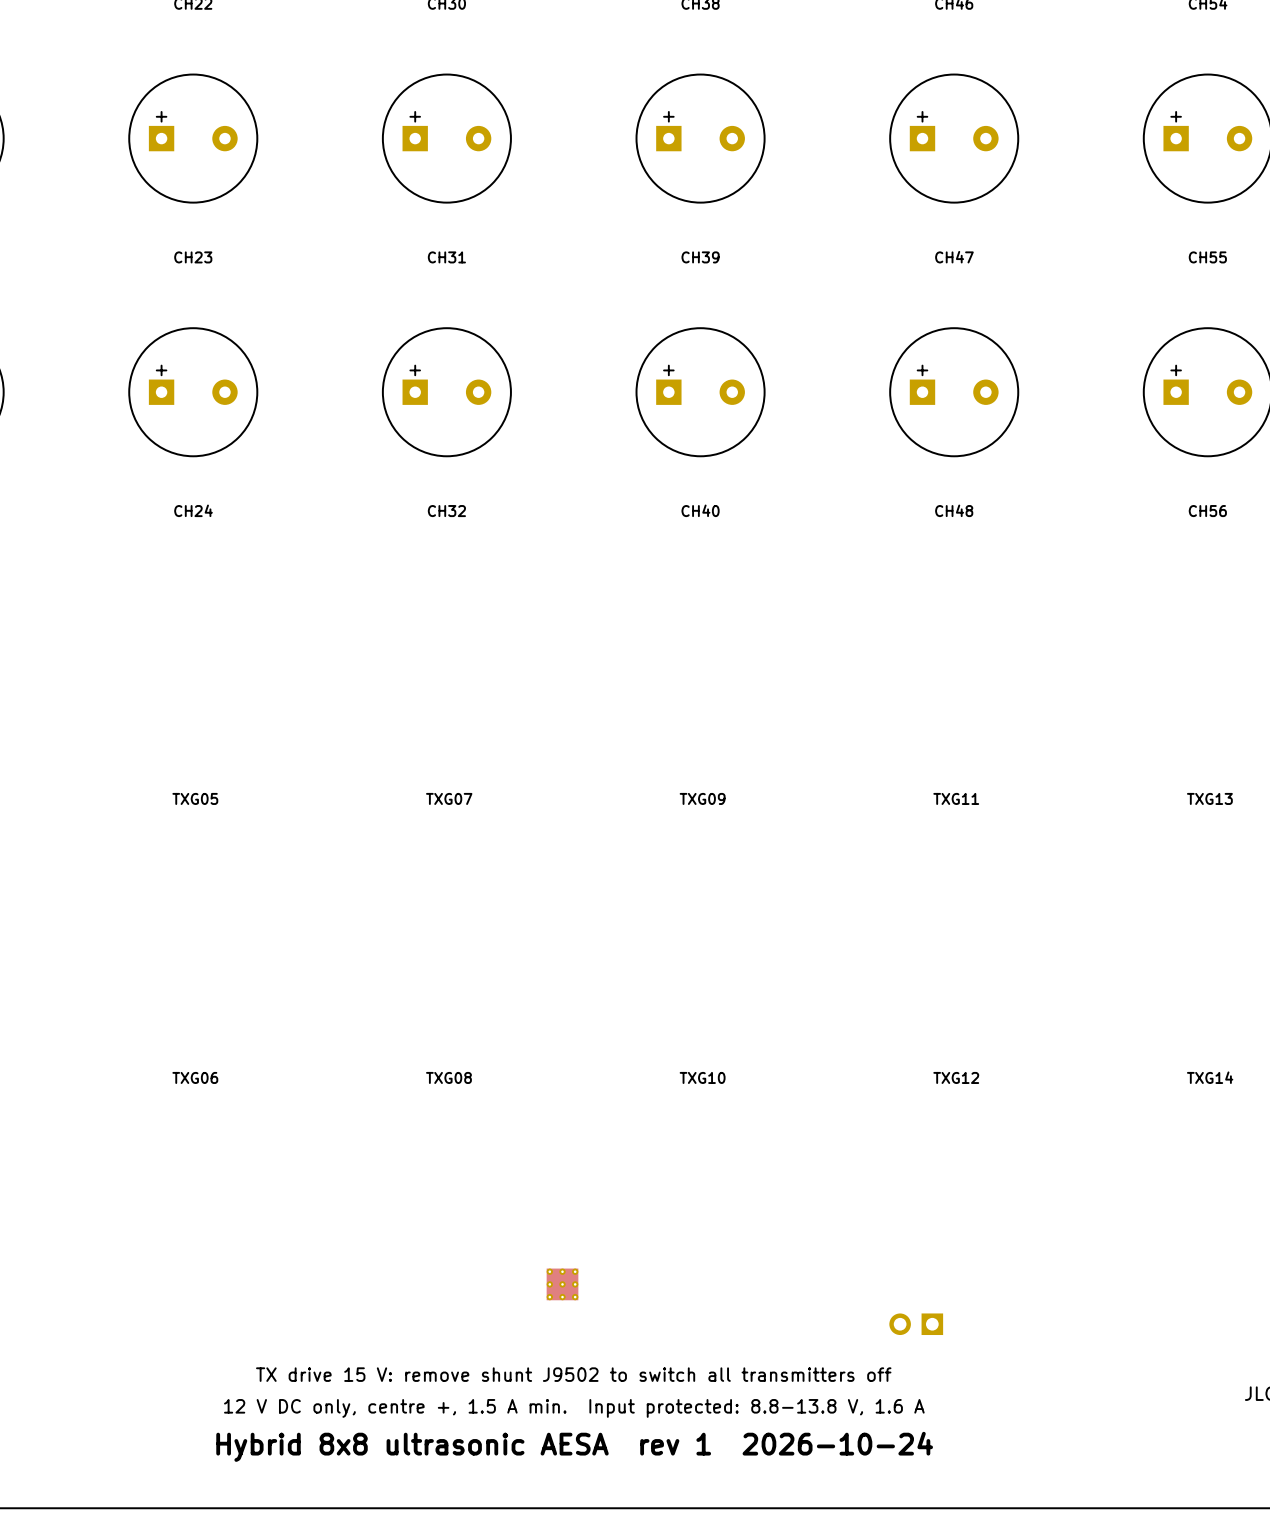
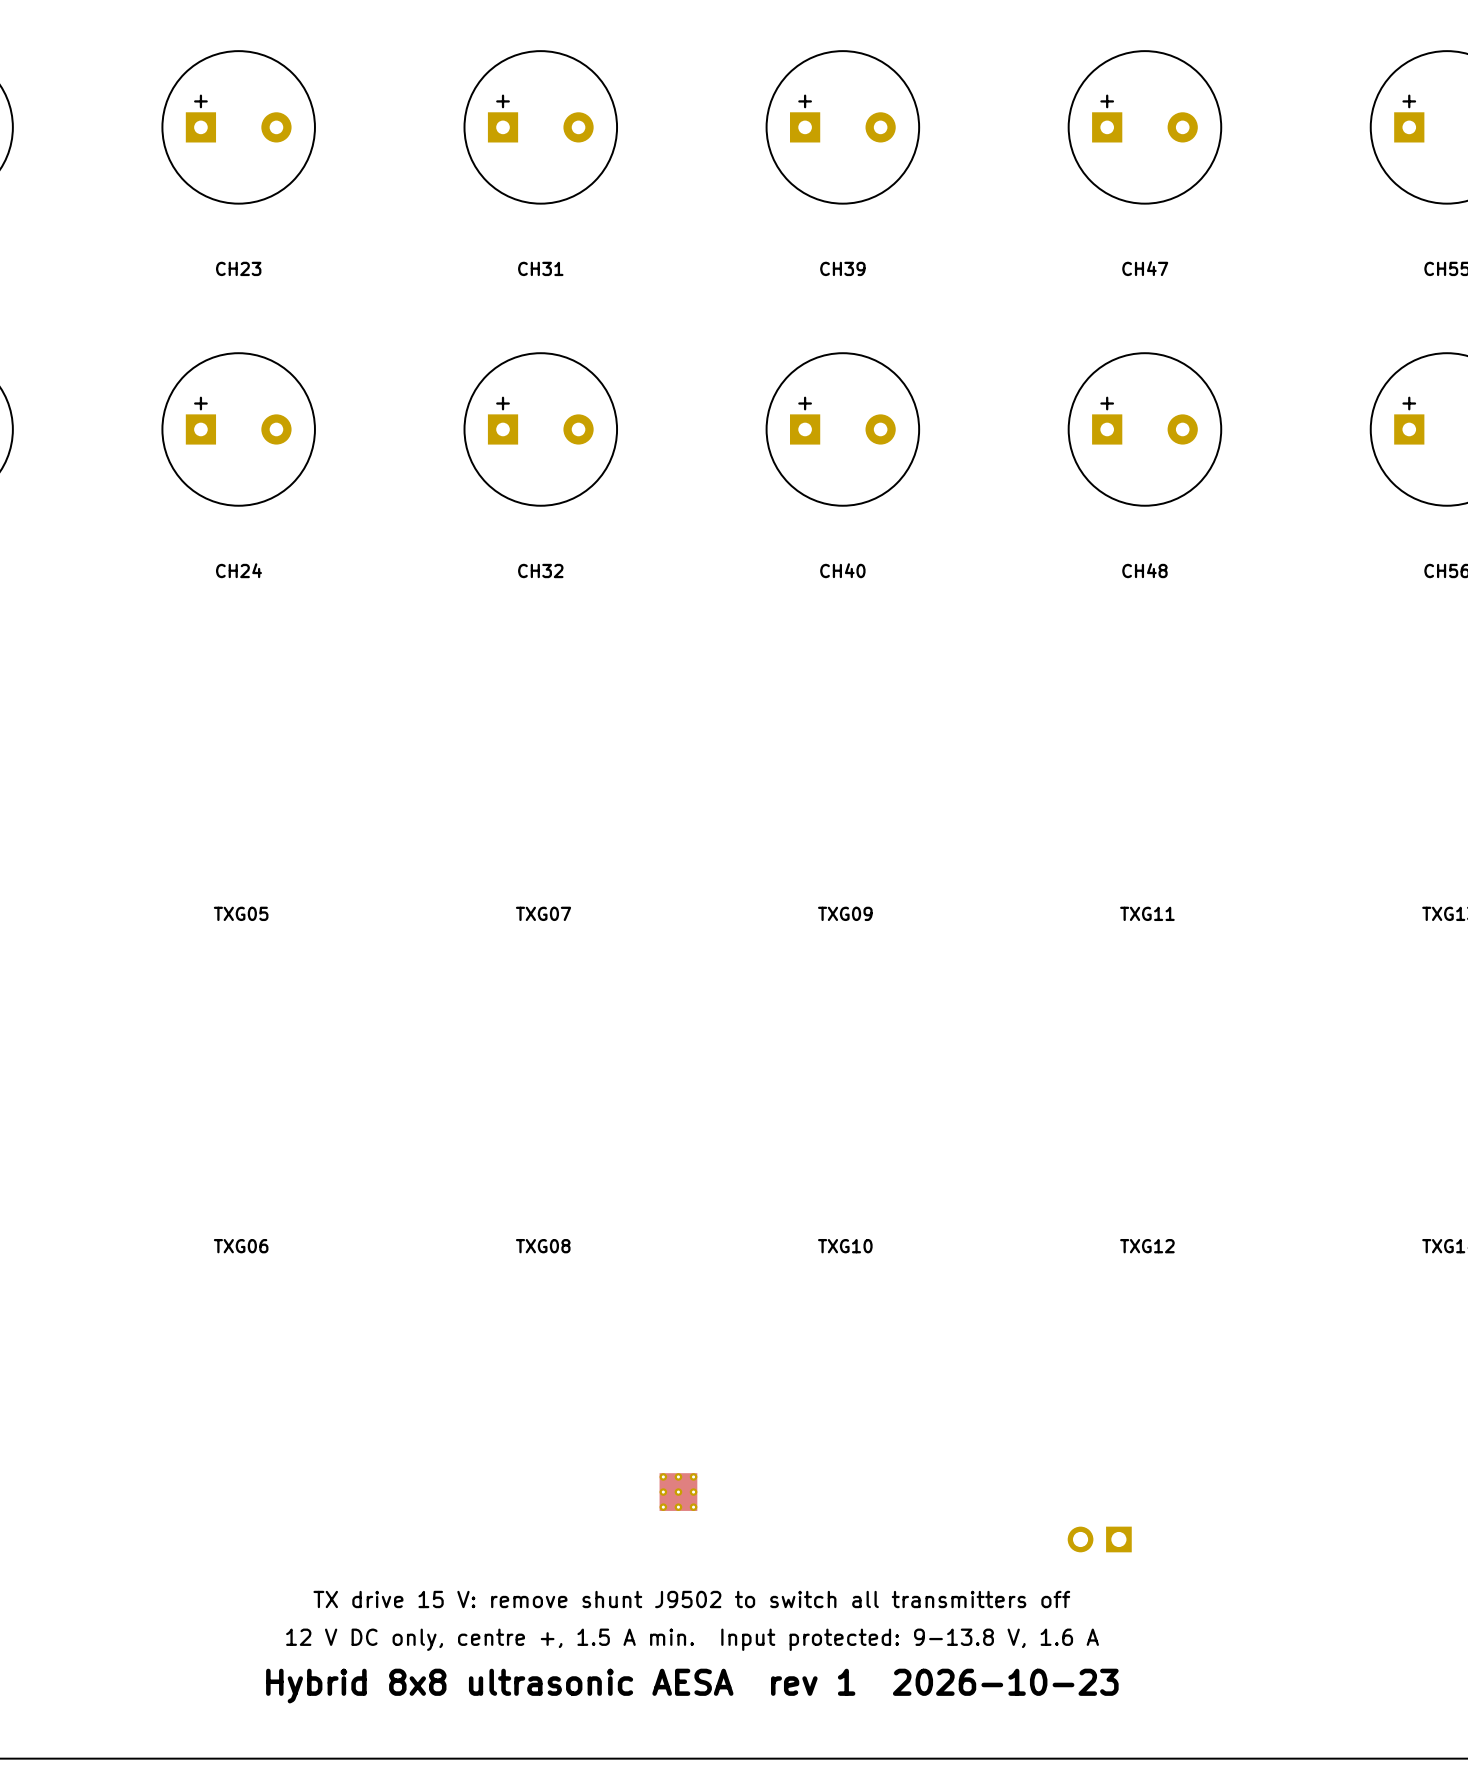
text: 12 V DC only, centre +, 1.5 A min. Input protected: 8.8-13.8 V, 1.6 A (574, 1408) -> 12 V DC only, centre +, 1.5 A min. Input protected: 9-13.8 V, 1.6 A (692, 1639)
text: Hybrid 8x8 ultrasonic AESA rev 1 2026-10-24 (574, 1446) -> Hybrid 8x8 ultrasonic AESA rev 1 2026-10-23 (692, 1686)

